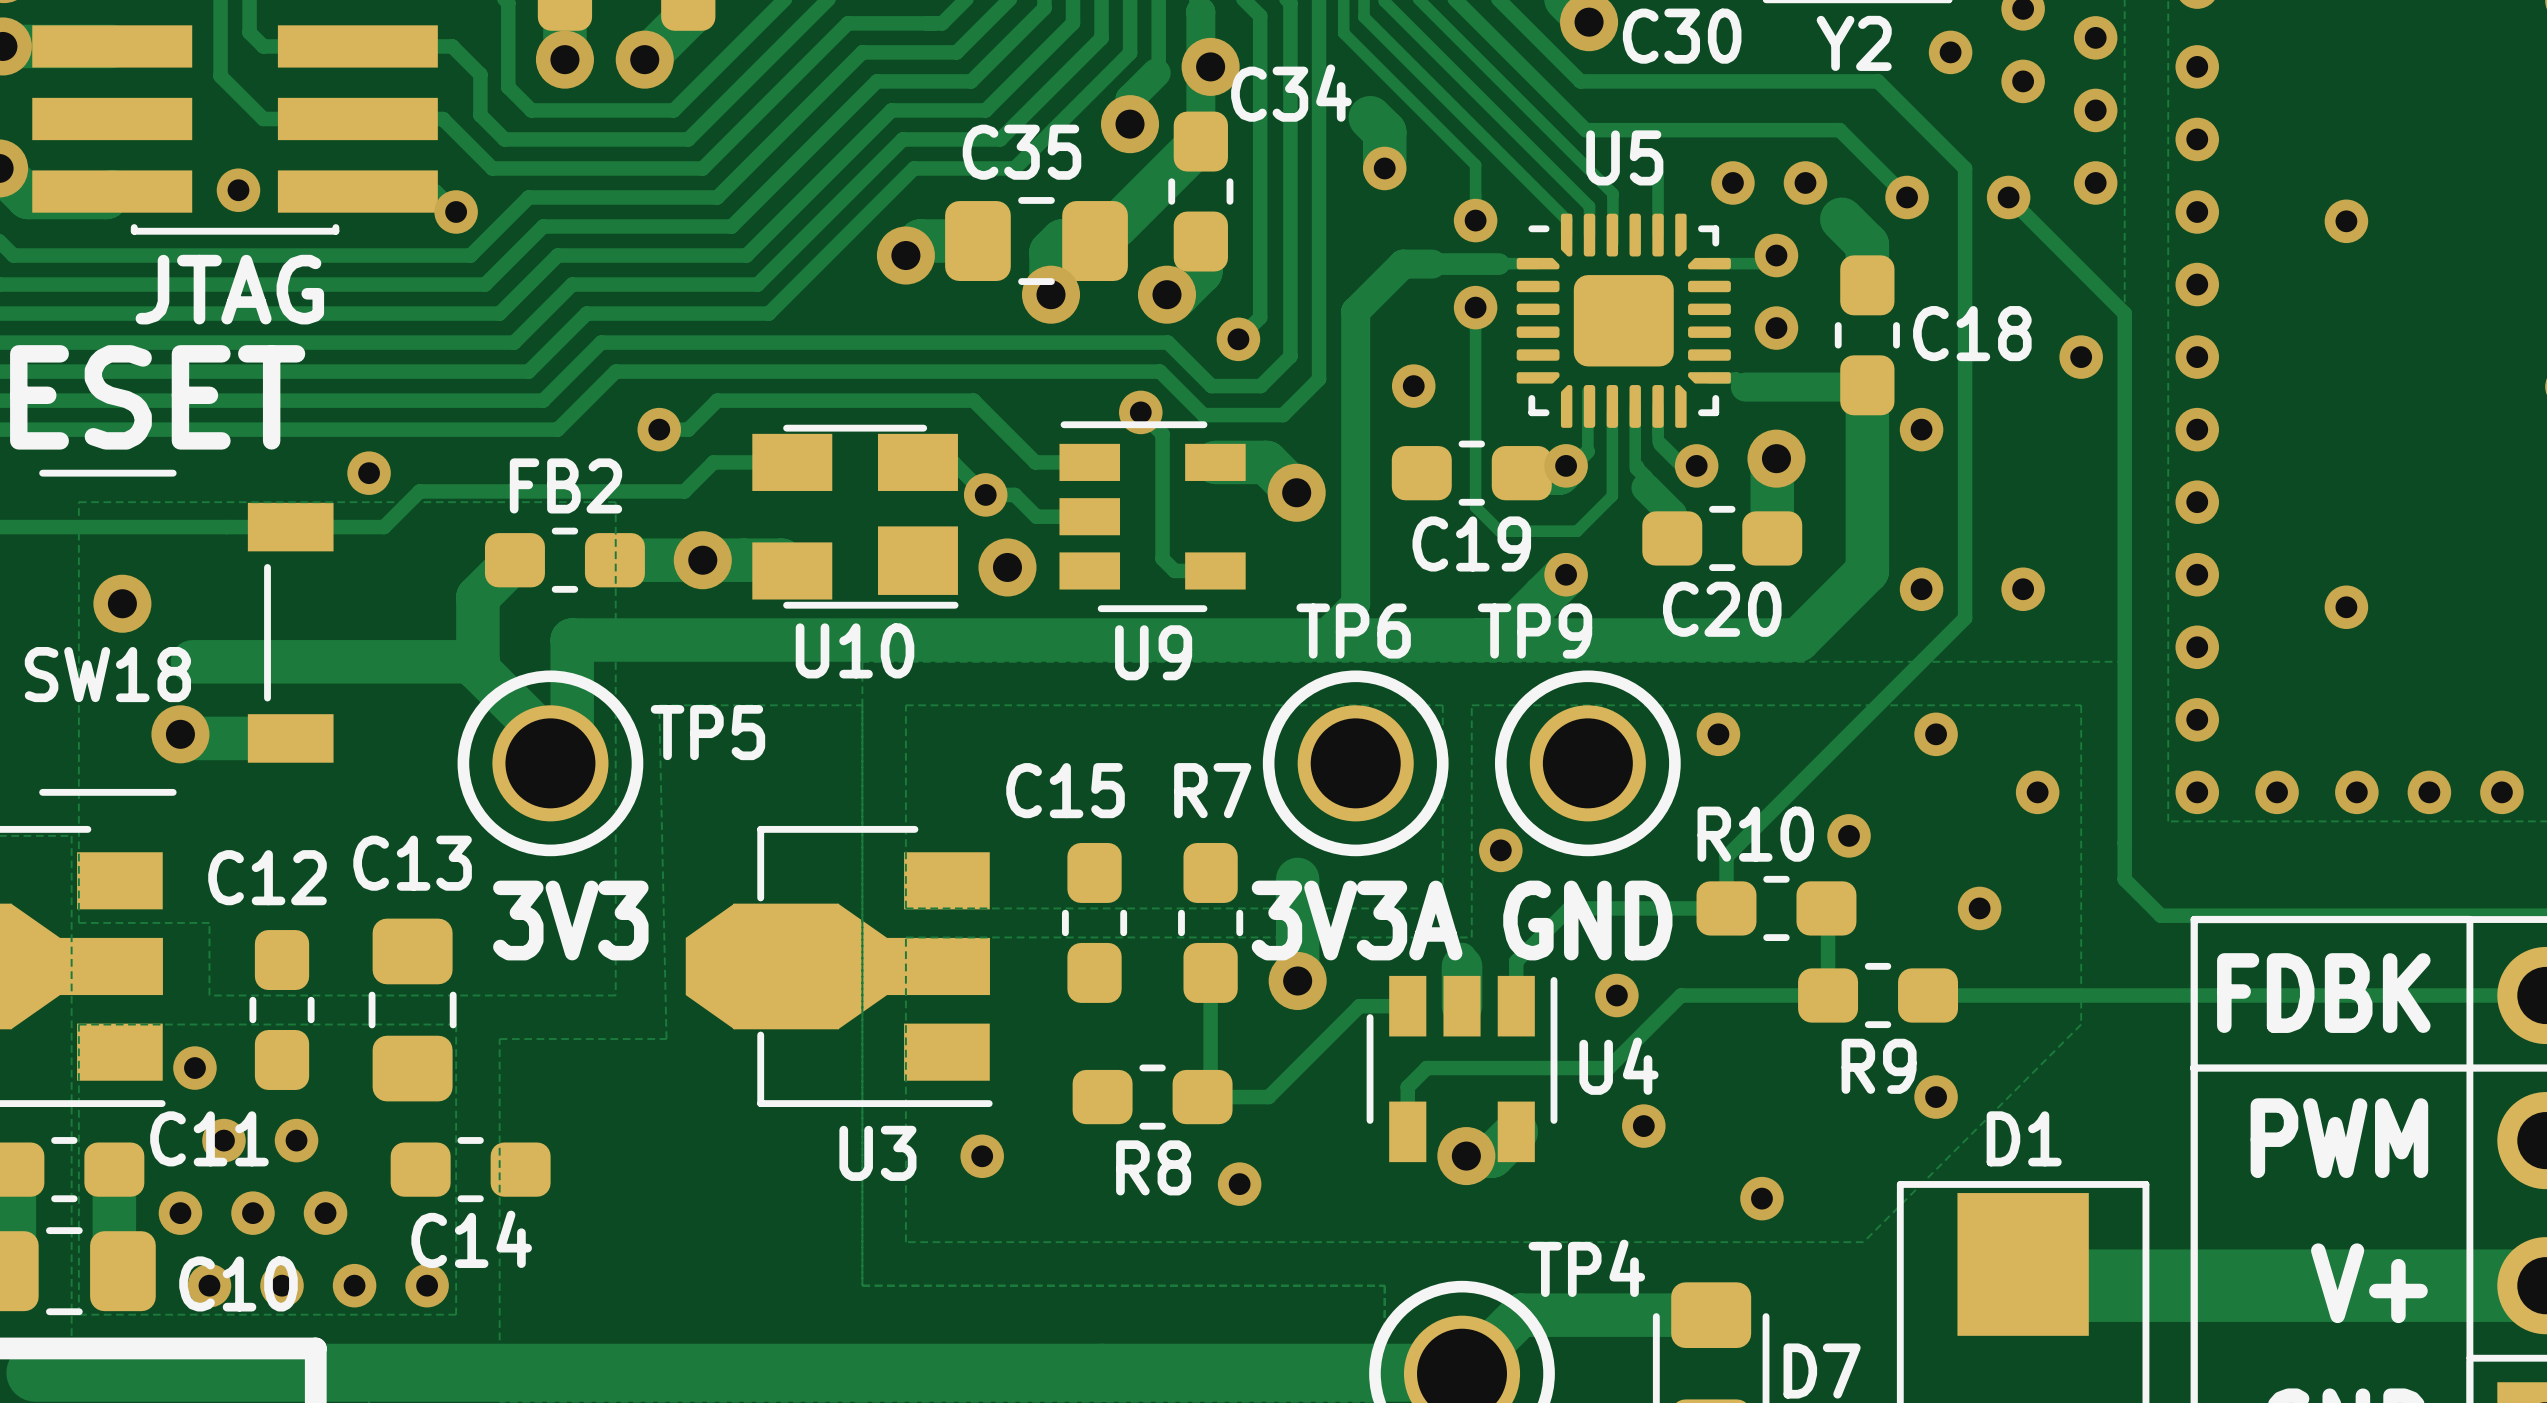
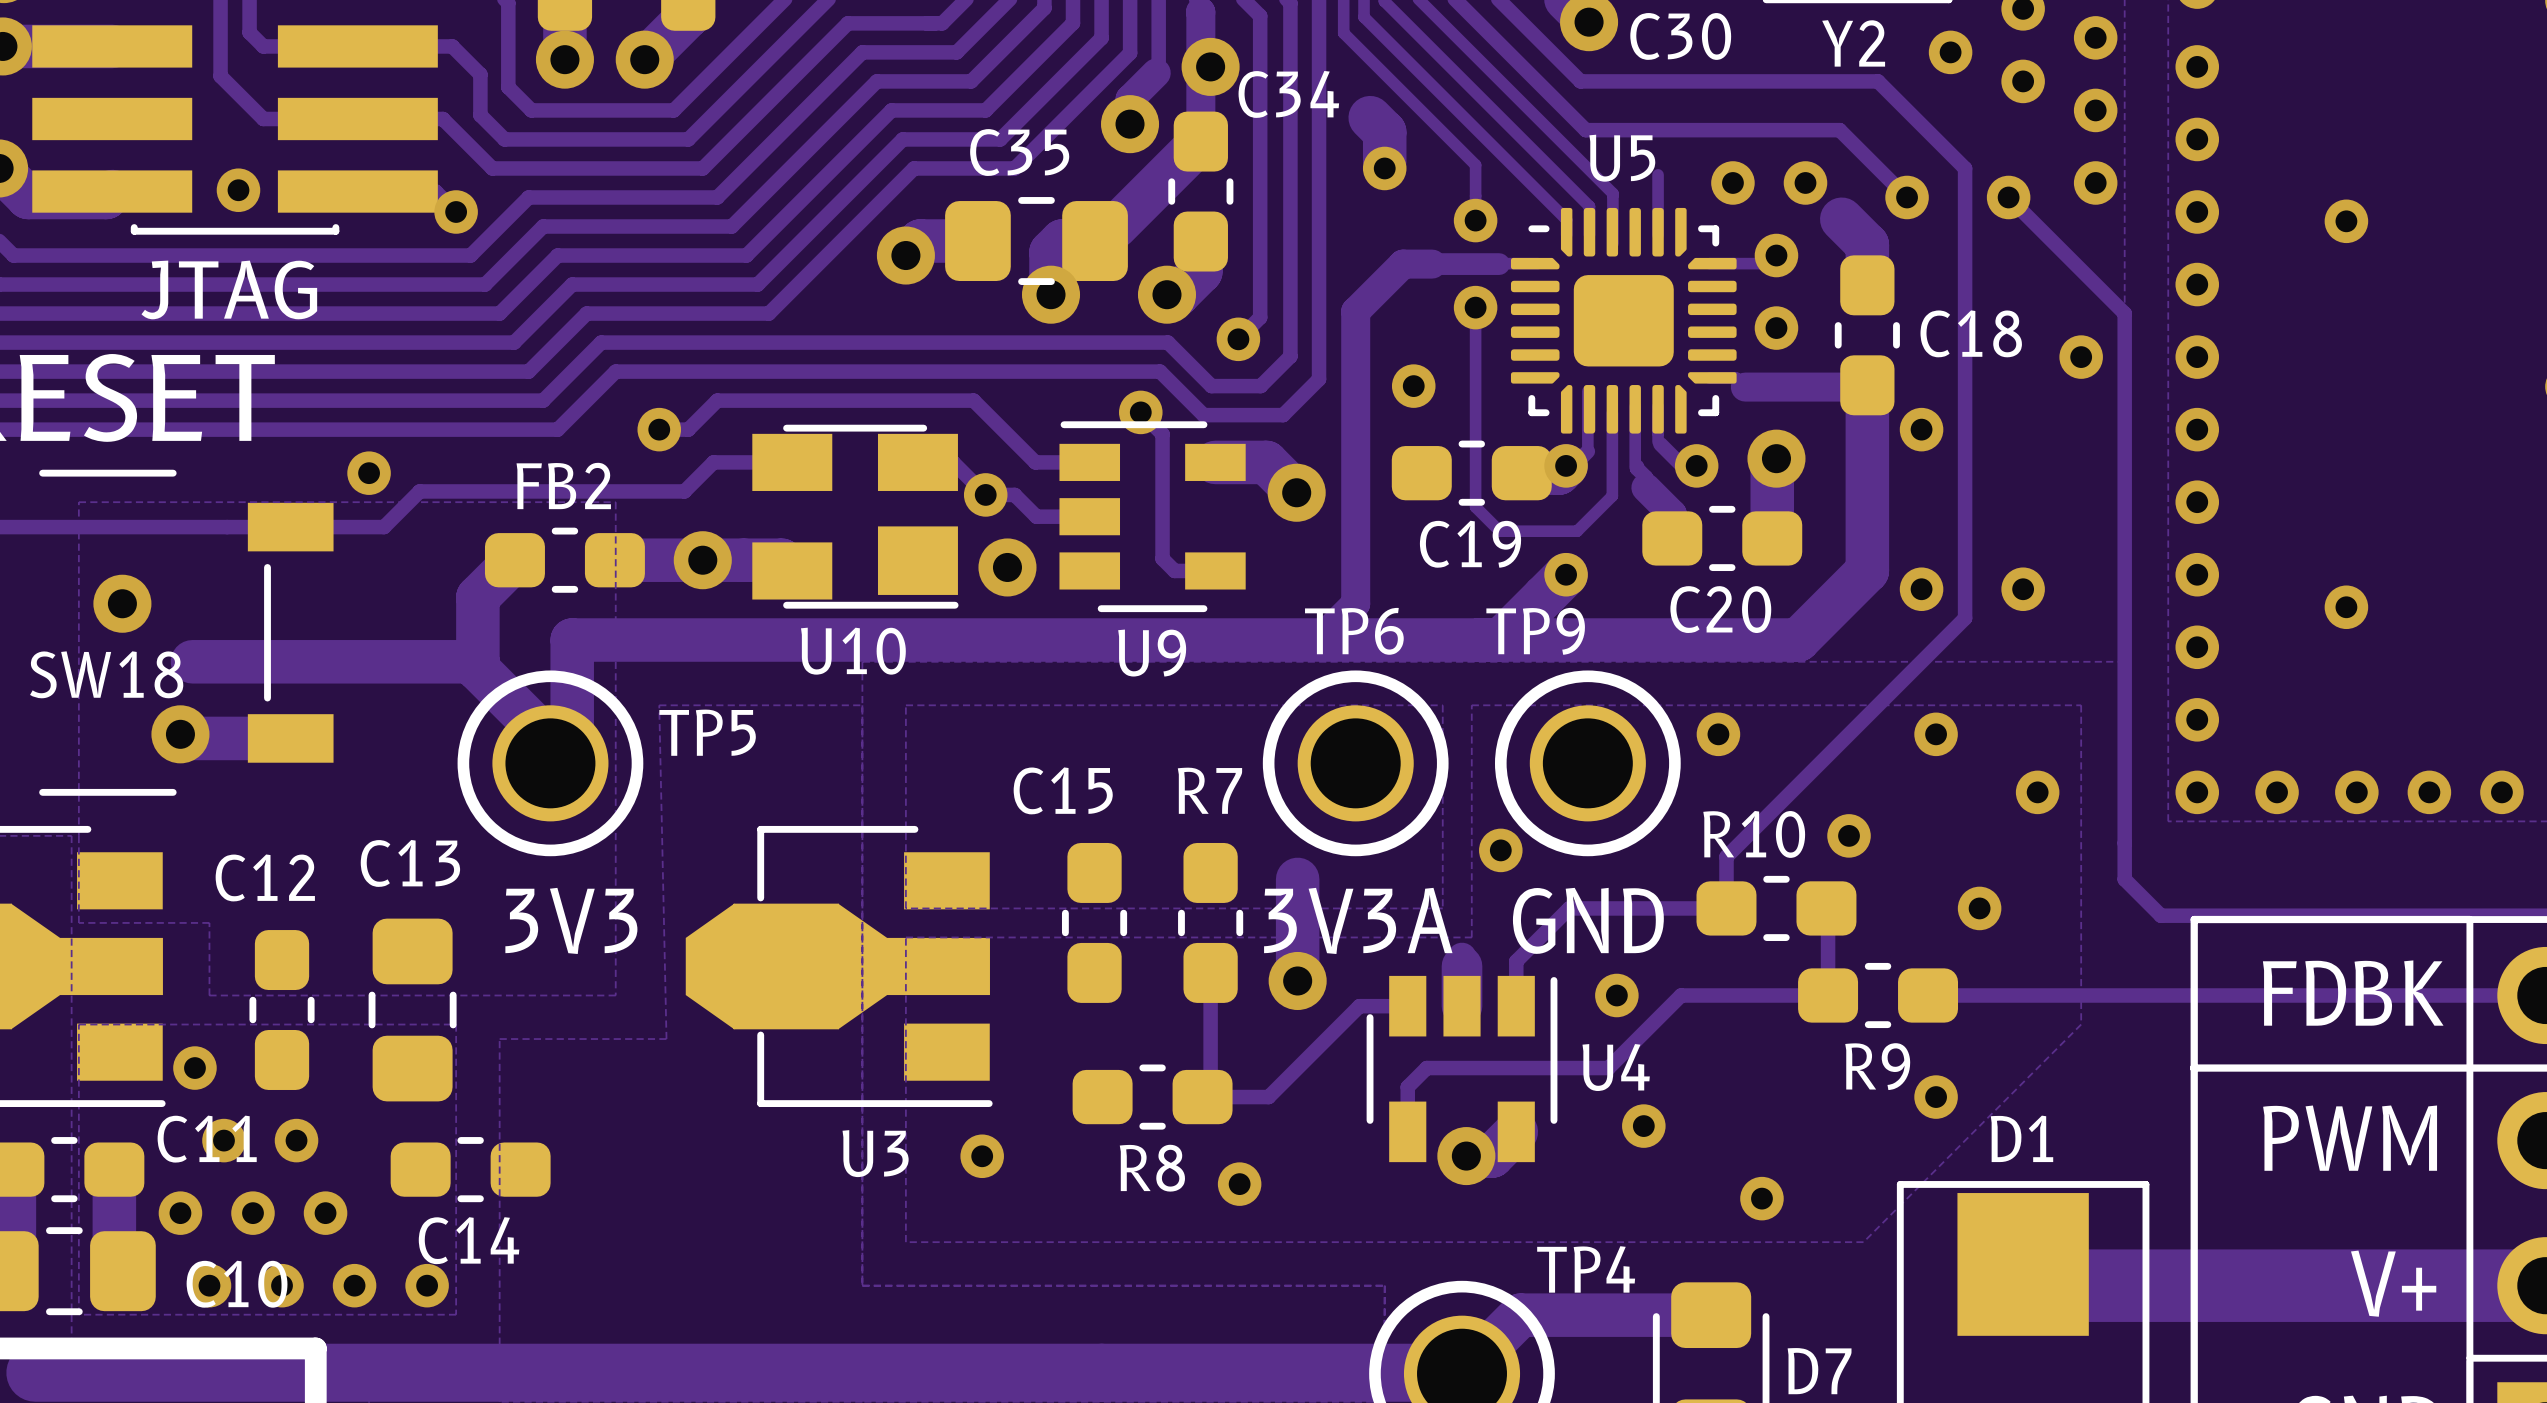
U5 footprint: [1516, 213, 1731, 428] -> [1510, 207, 1737, 434]

